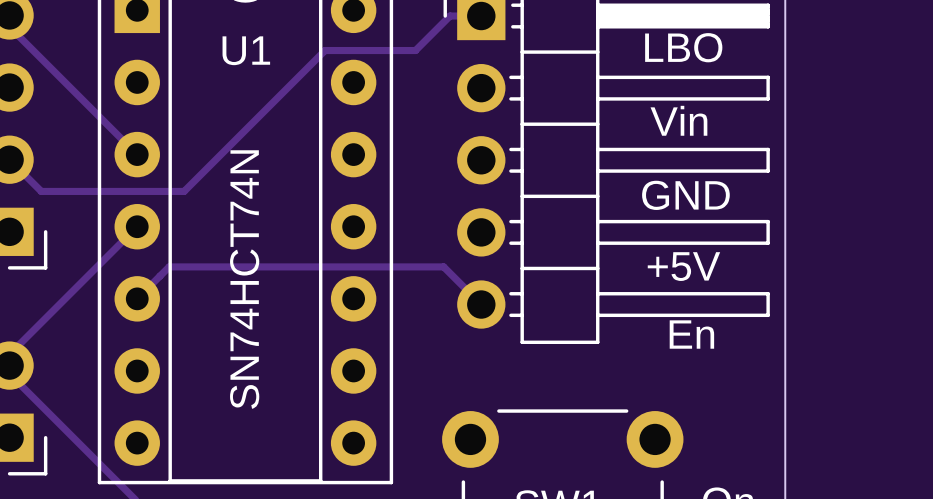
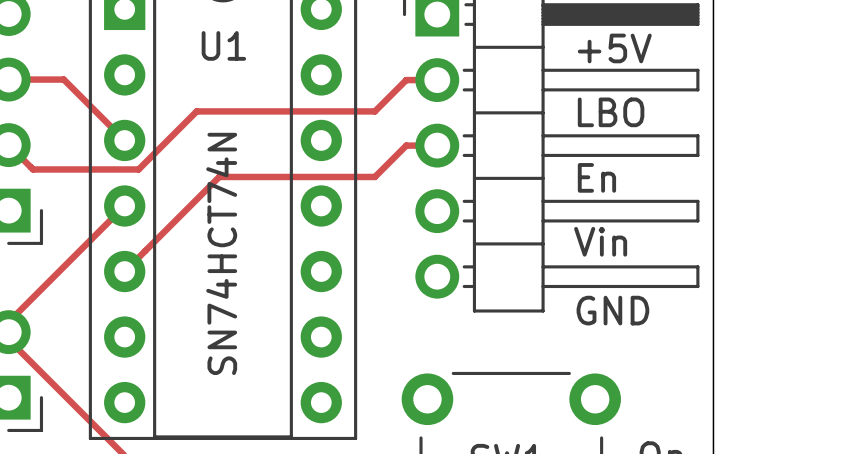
track: (9, 15) (9, 26) (70, 87) -> (8, 79) (63, 79)
track: (481, 16) (450, 16) (415, 50) (325, 50) (184, 191) (41, 191) (36, 186) -> (437, 80) (406, 80) (374, 111) (196, 111) (138, 169) (33, 169)
text position: LBO (683, 47) -> LBO (611, 112)
text position: Vin (678, 120) -> Vin (600, 241)
text position: GND (685, 195) -> GND (612, 310)
track: (169, 266) (443, 266) (481, 304) -> (153, 242) (219, 176) (374, 176) (406, 145) (437, 145)
text position: +5V (683, 266) -> +5V (614, 48)
text position: En (691, 334) -> En (596, 177)

